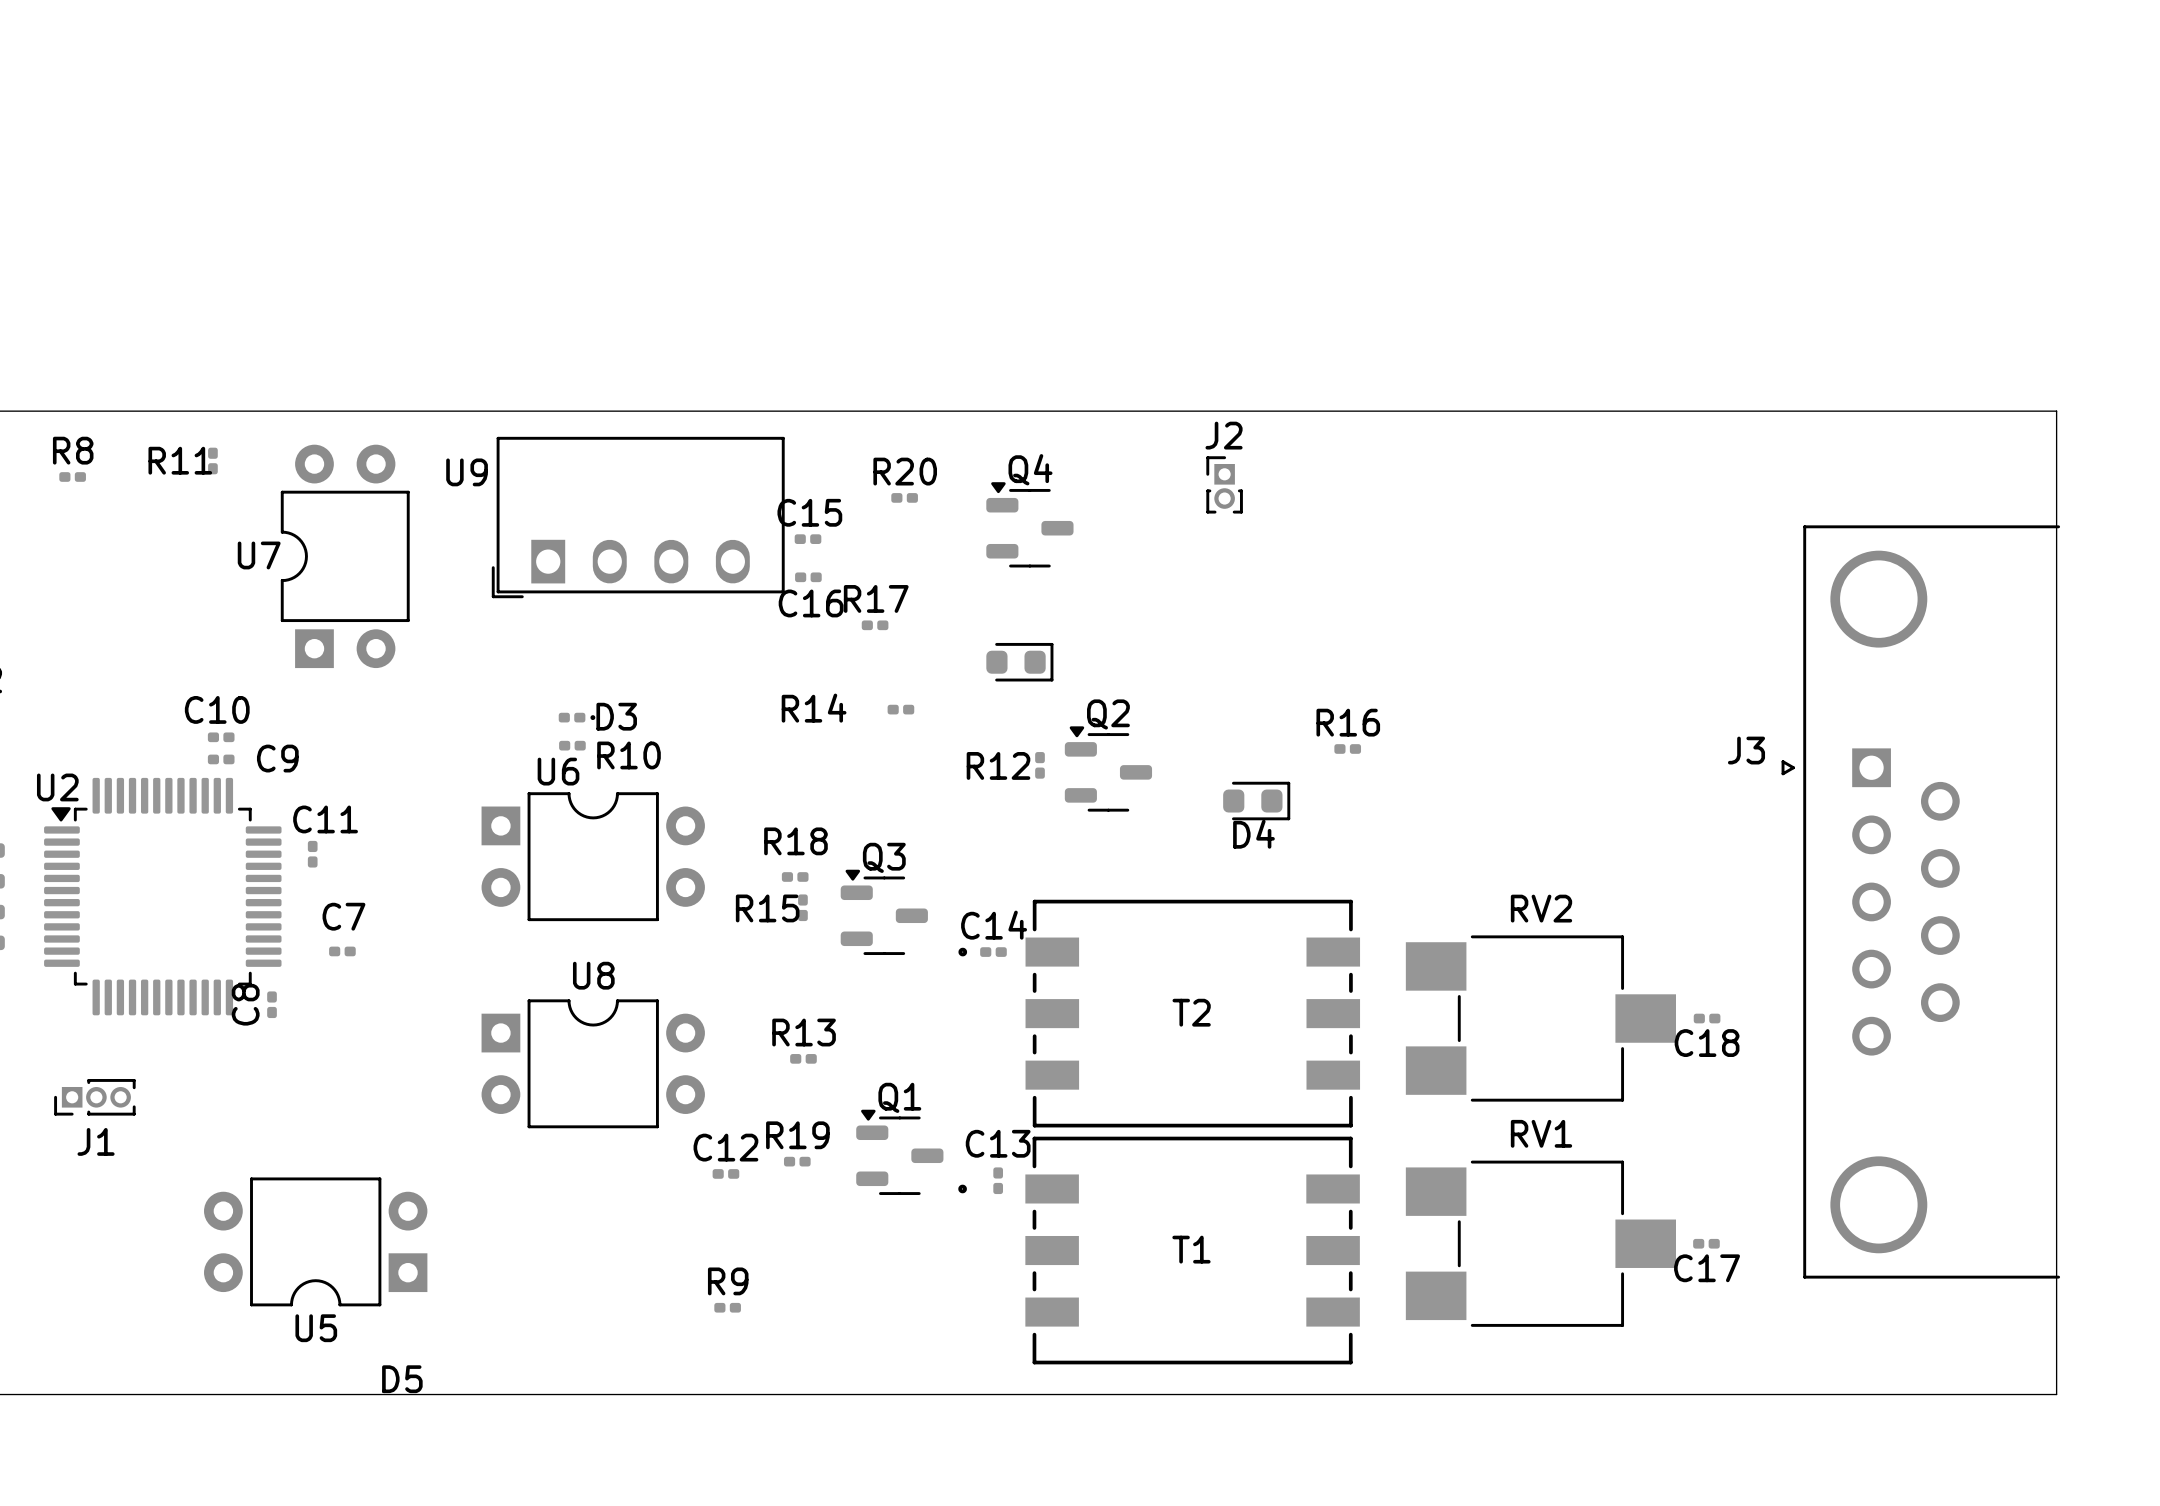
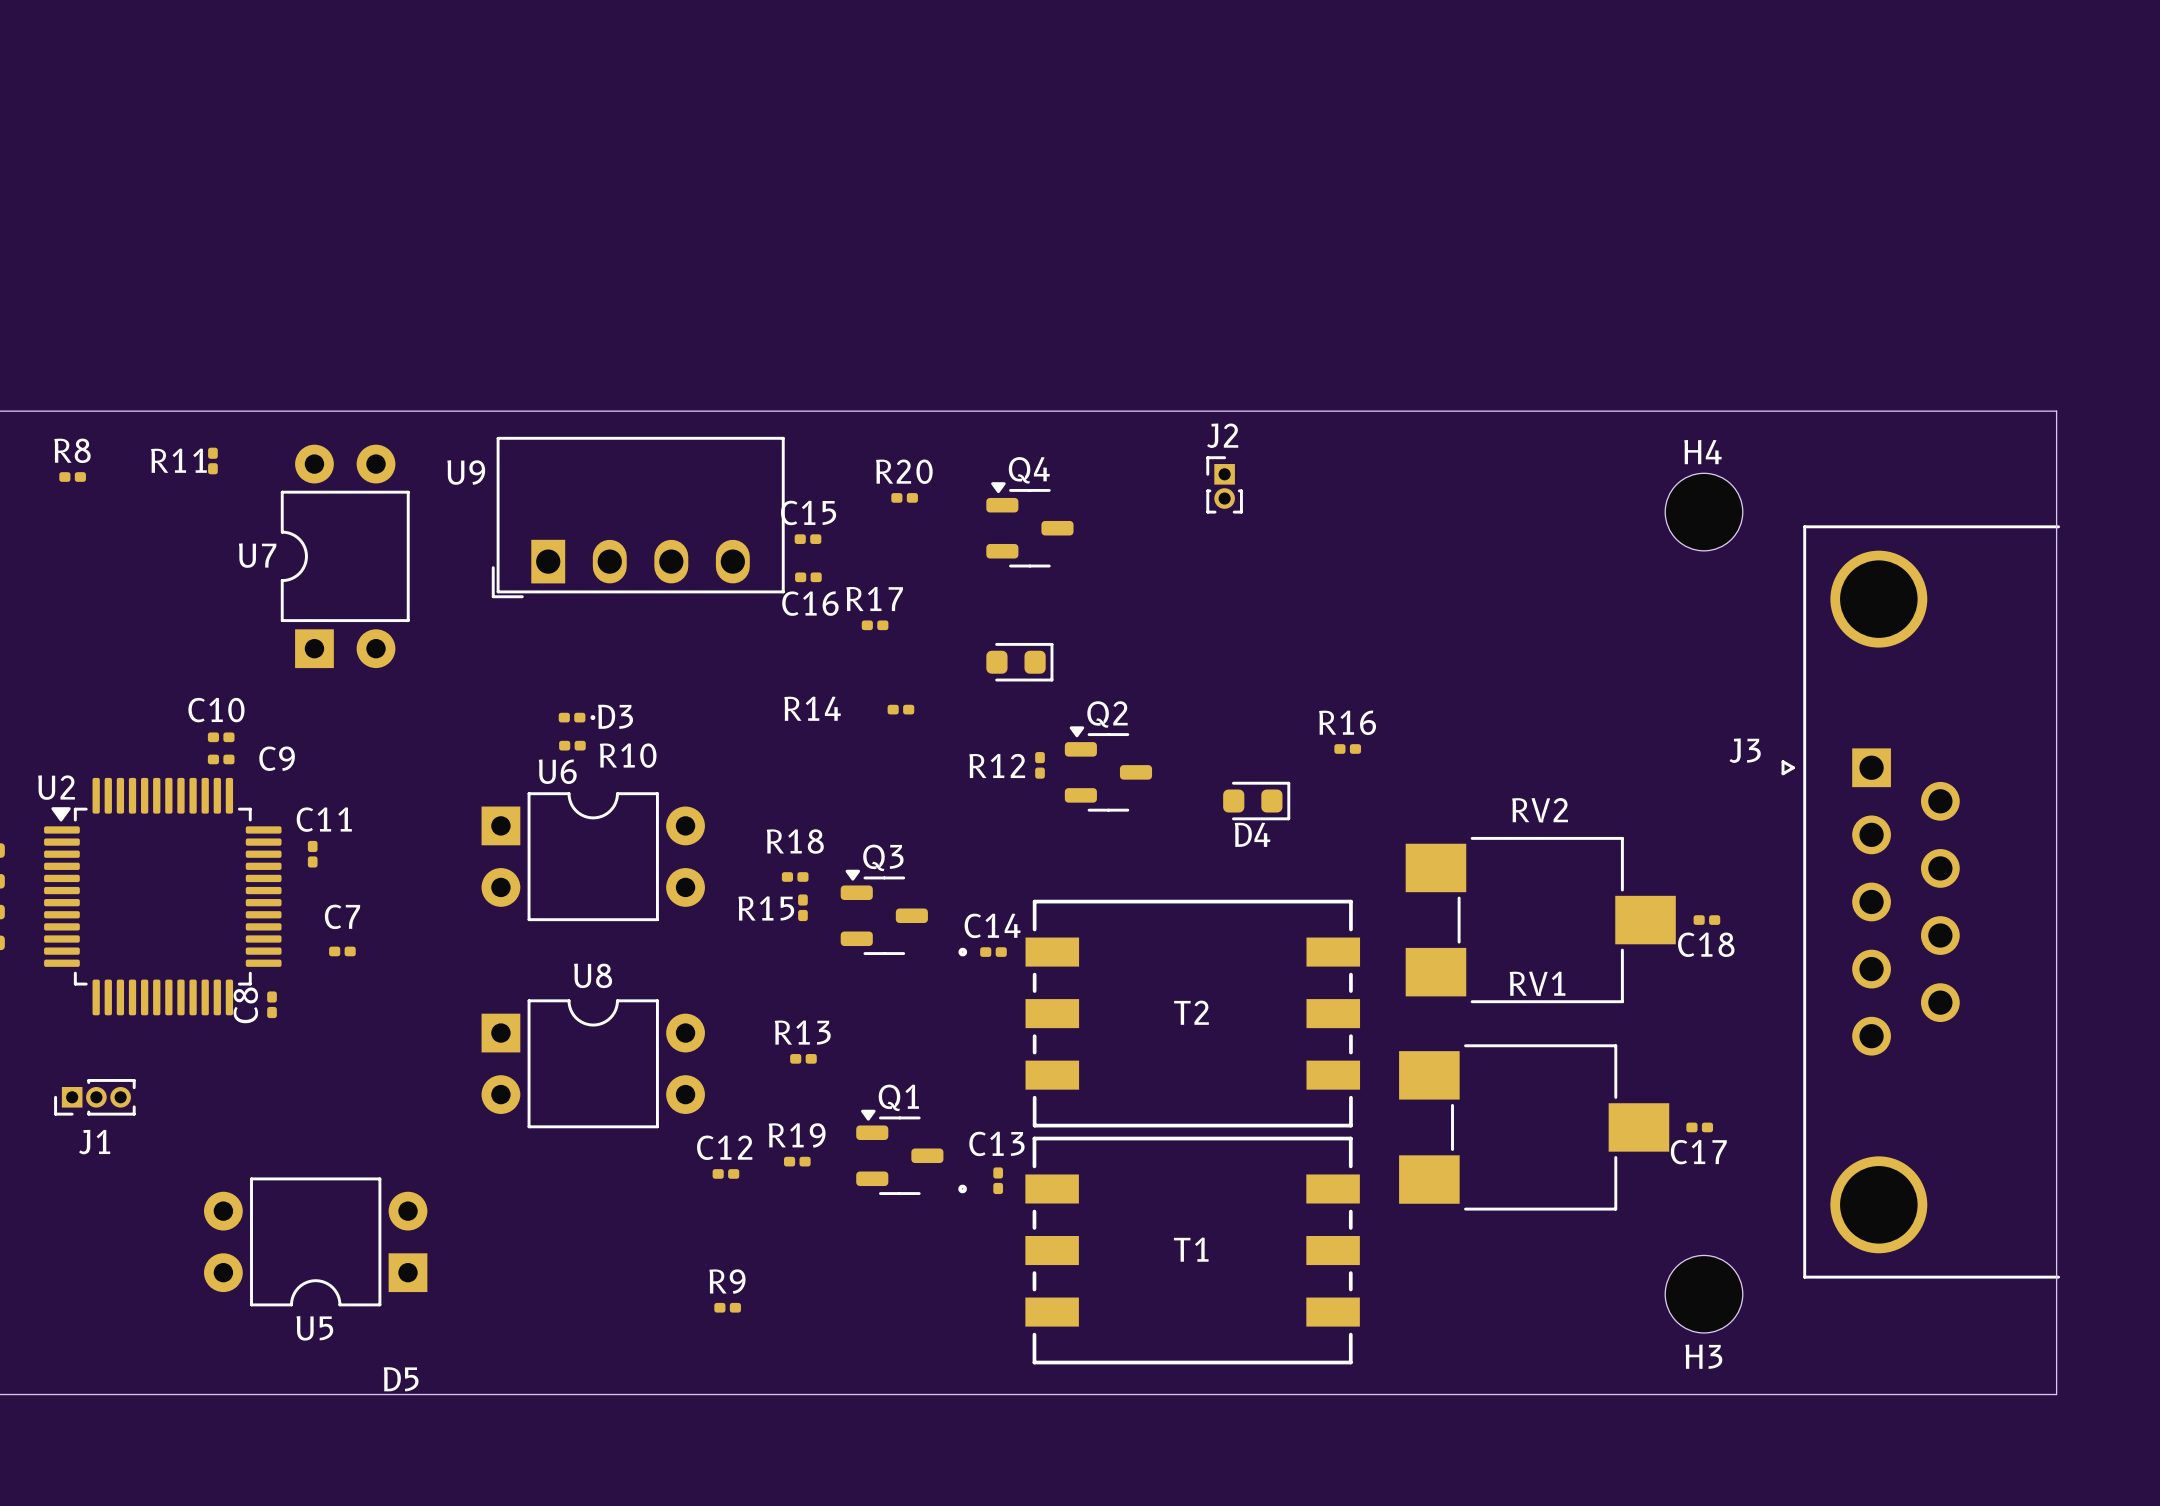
H4: none -> (1703, 512)
RV2 position: (1540, 1018) -> (1540, 920)
C18 position: (1707, 1018) -> (1706, 920)
RV1 name position: RV1 (1541, 1133) -> RV1 (1537, 983)
RV1 position: (1540, 1243) -> (1534, 1127)
C17 position: (1706, 1243) -> (1699, 1127)
H3: none -> (1703, 1294)

